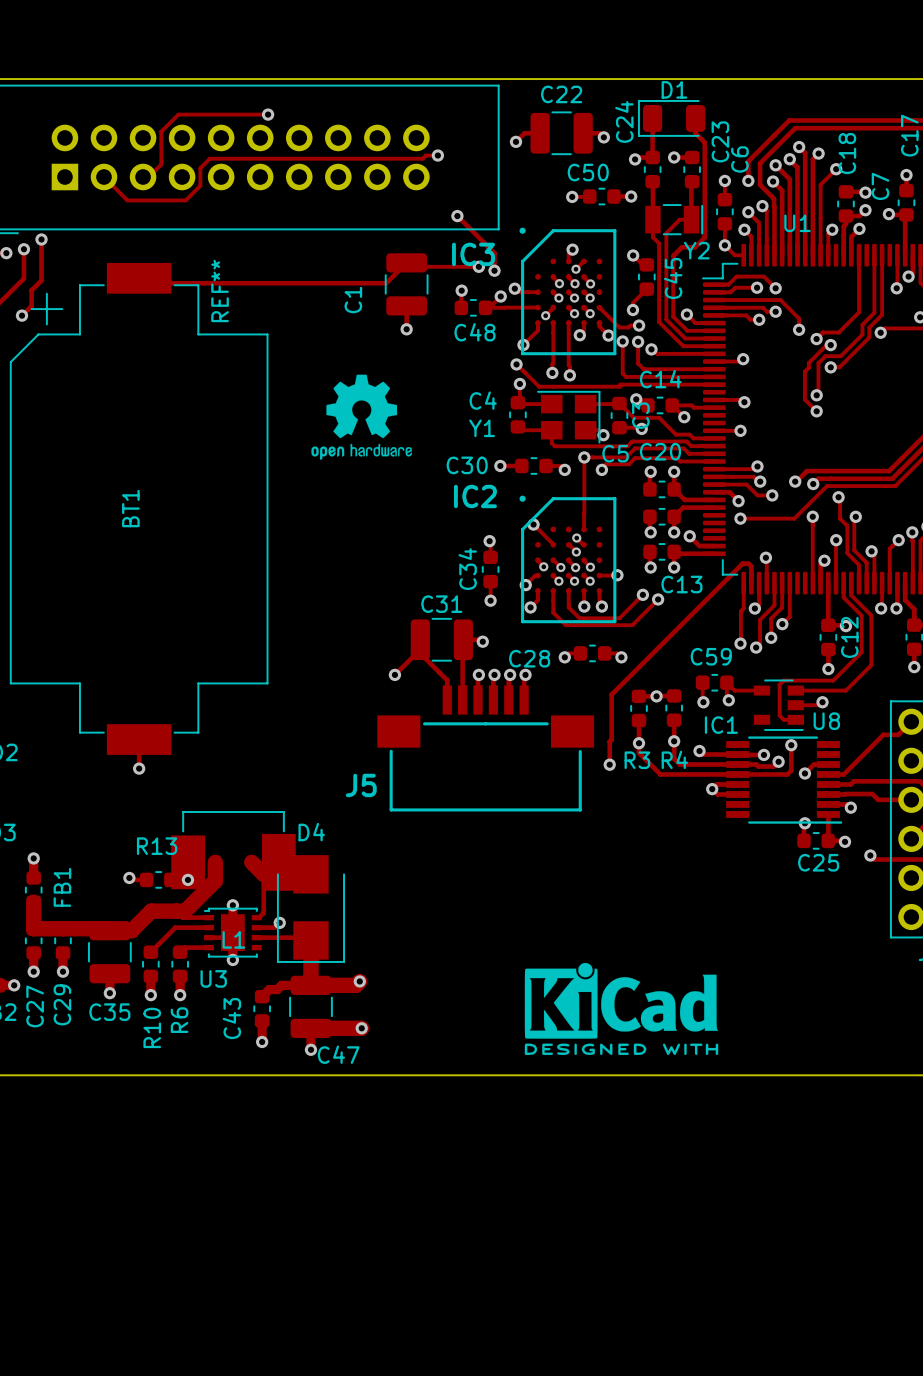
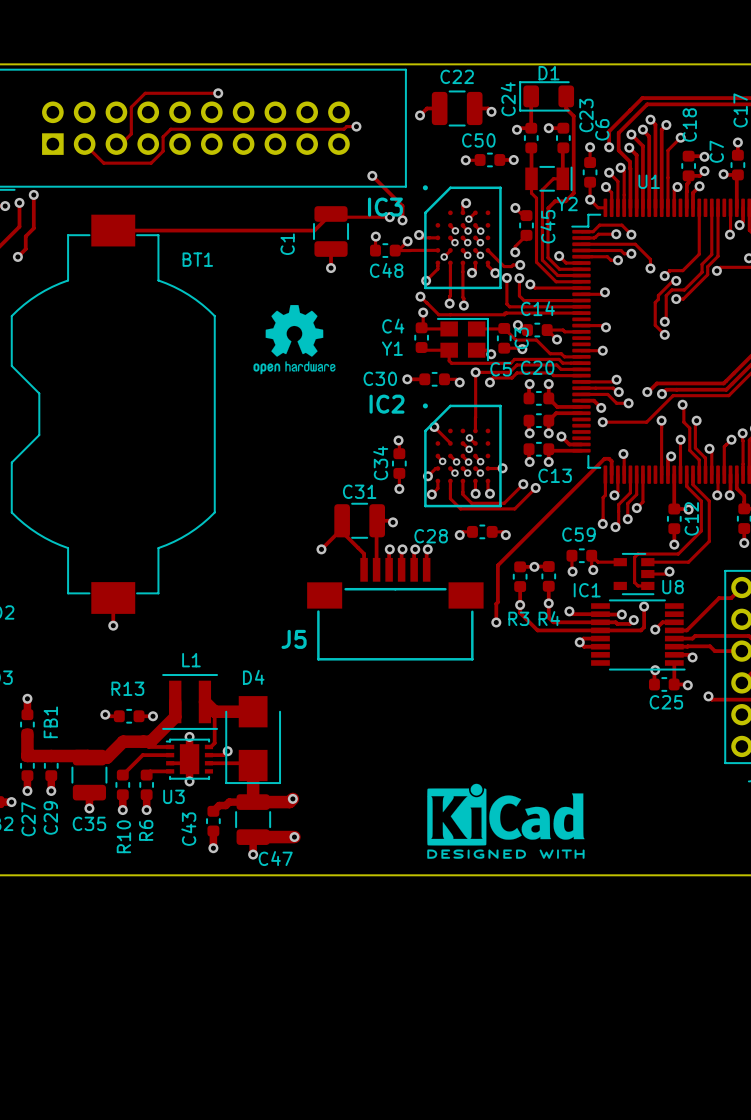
BT1 footprint: [9, 262, 269, 755] -> [11, 214, 216, 614]
BT1 name position: BT1 (130, 508) -> BT1 (197, 259)
L1 footprint: [171, 811, 296, 891] -> [162, 674, 218, 730]
L1 name position: L1 (233, 939) -> L1 (191, 660)

